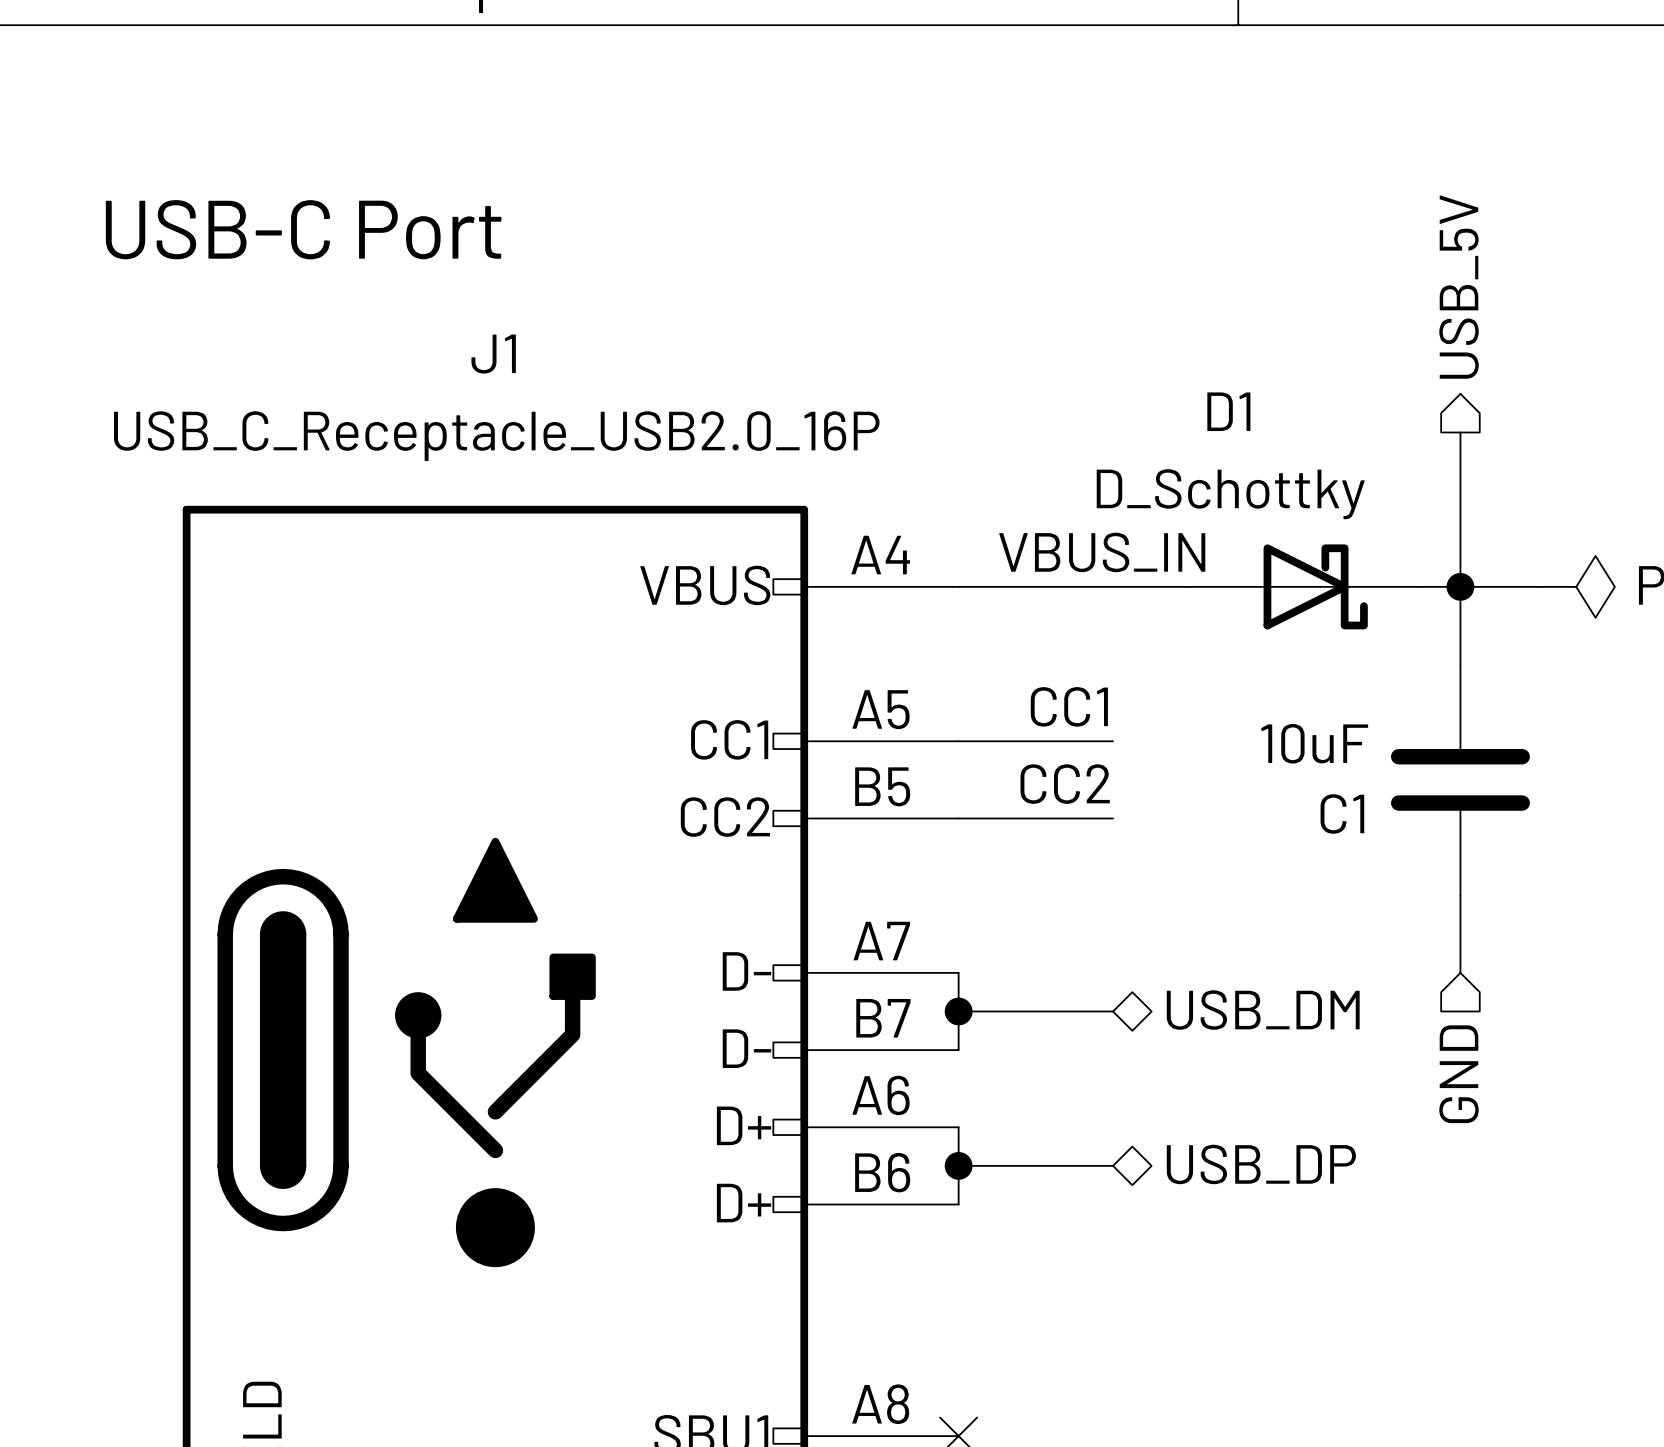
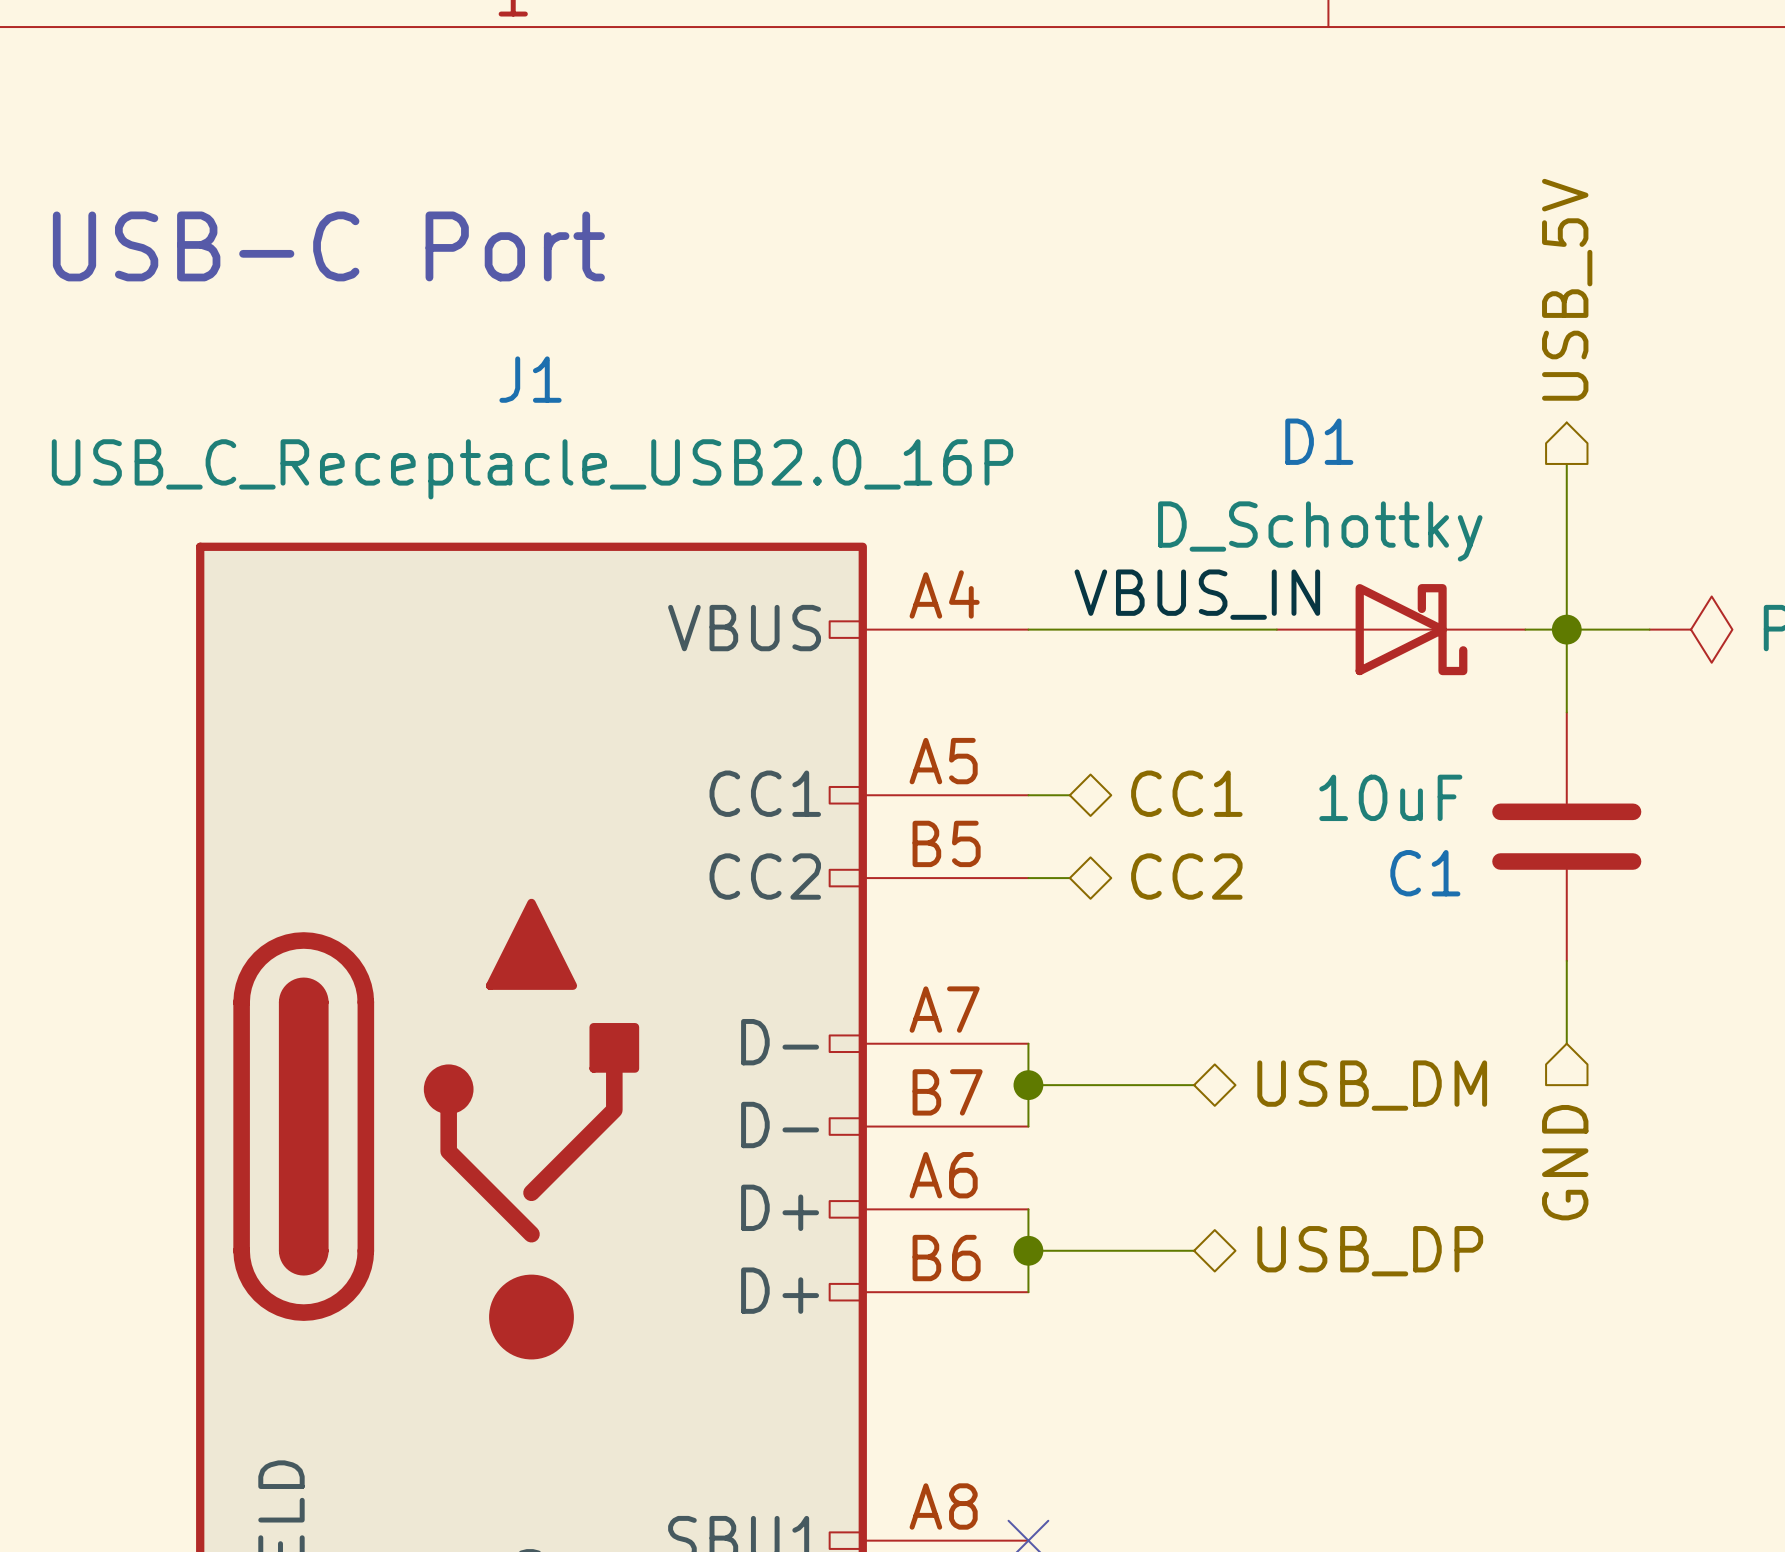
label: CC1 (1069, 706) -> none
hierarchical label: none -> CC1 (1186, 793)
wire: (997, 741) (1113, 741) -> none
label: CC2 (1065, 784) -> none
hierarchical label: none -> CC2 (1186, 876)
wire: (997, 818) (1113, 818) -> none

